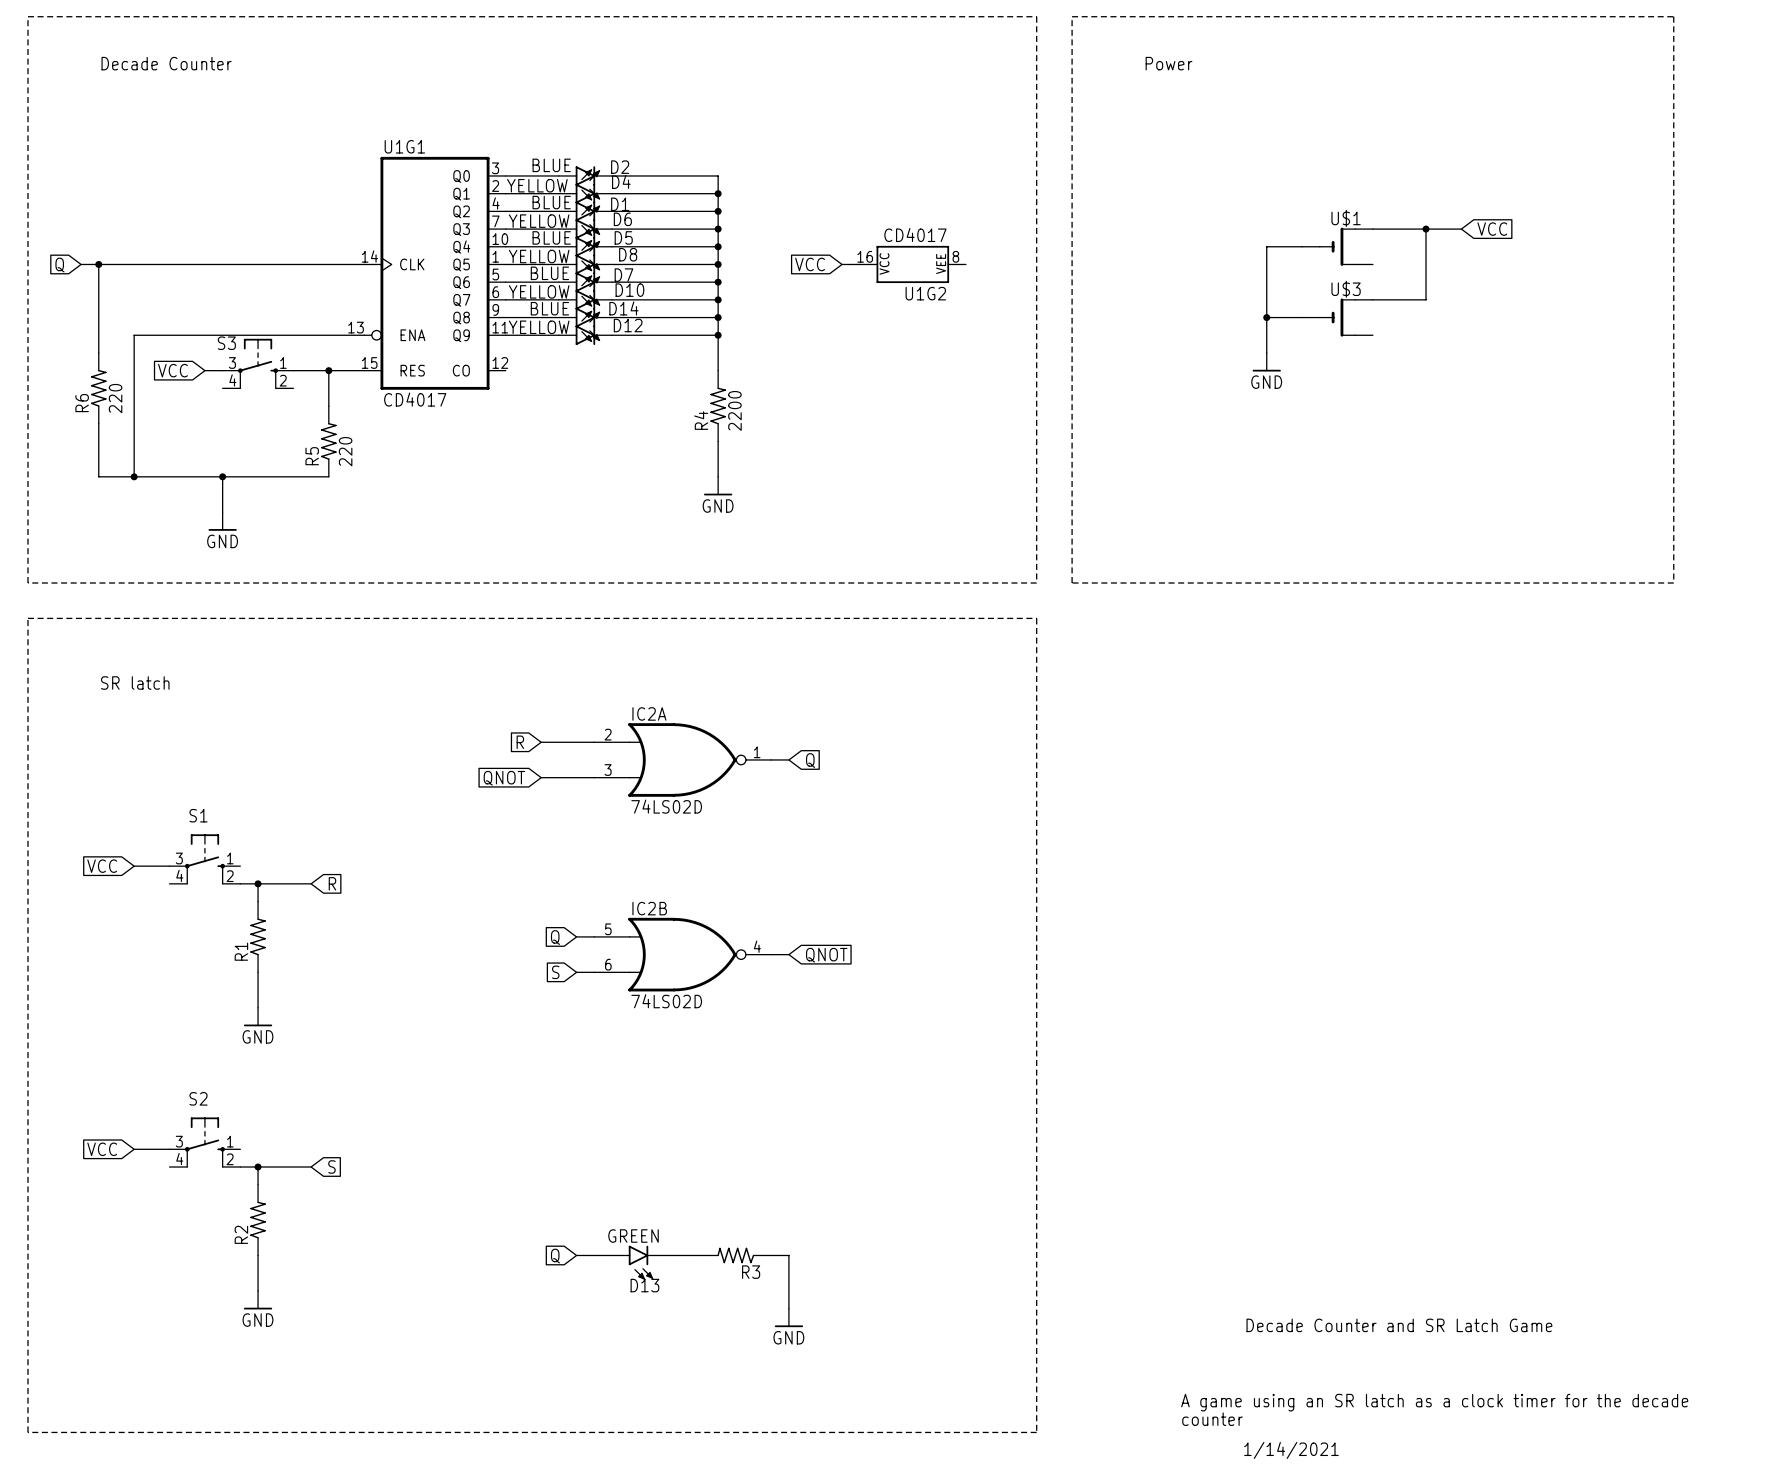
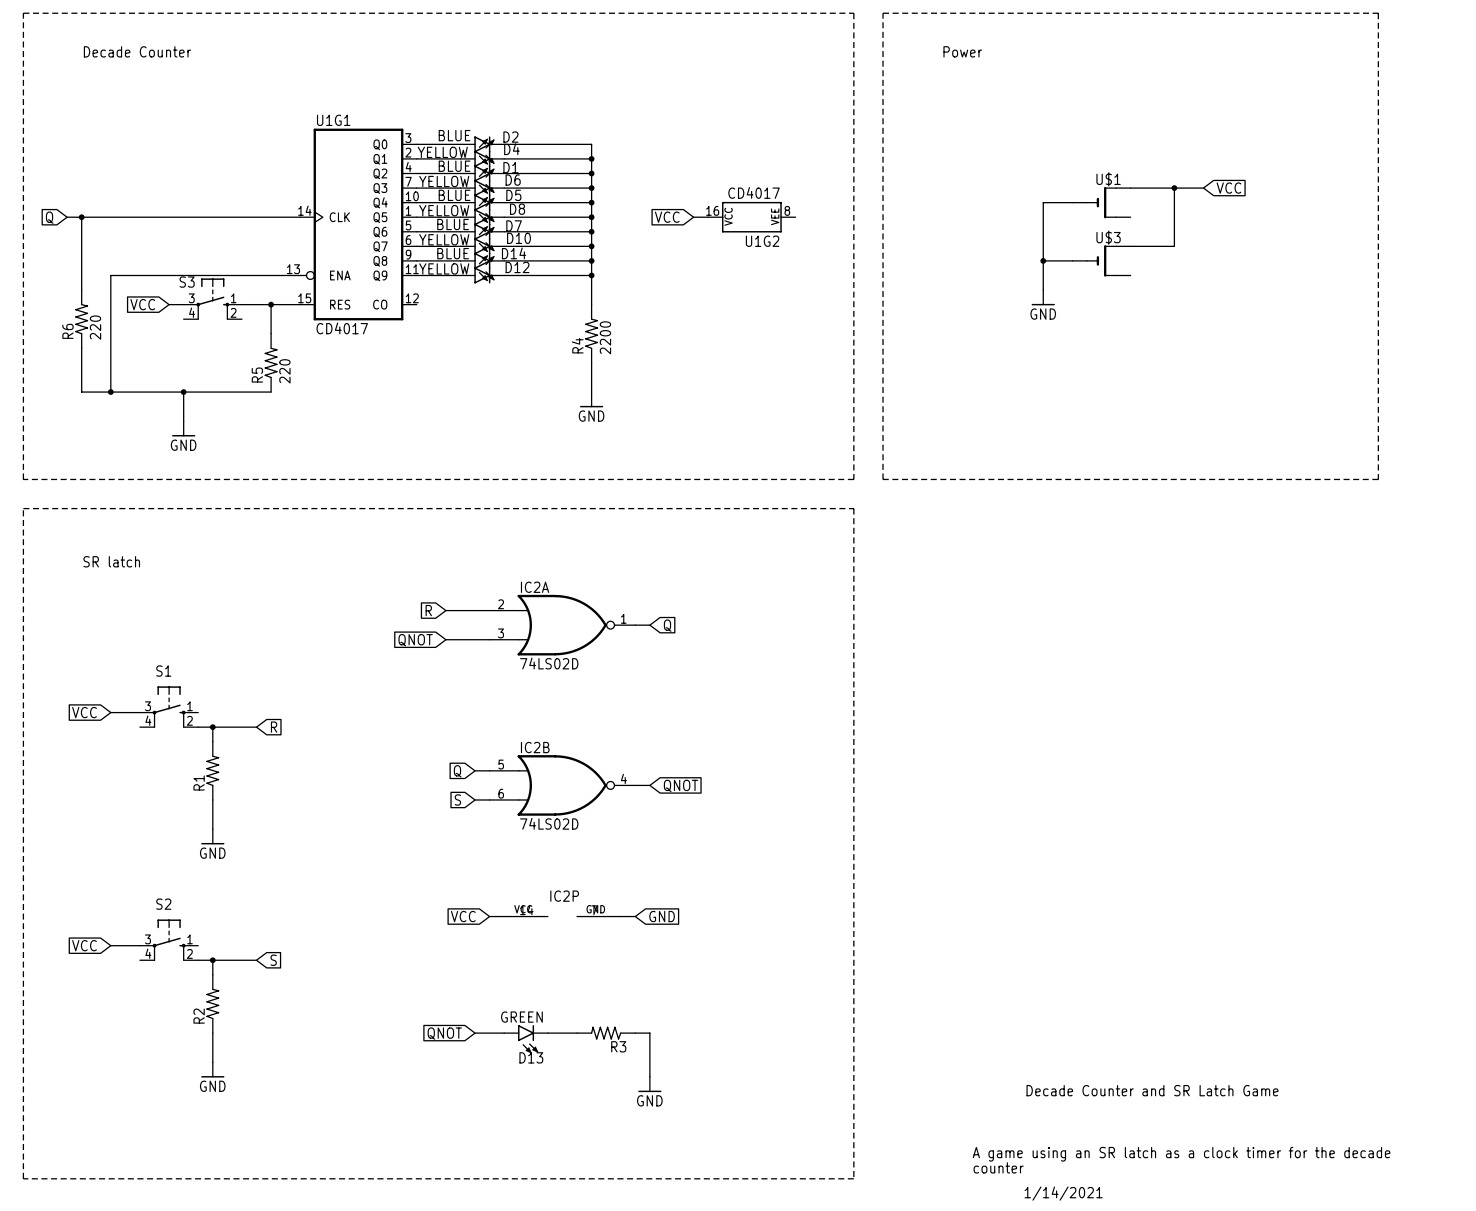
global label: none -> VCC (463, 916)
wire: none -> (489, 916) (504, 916)
IC2P: none -> (562, 916)
wire: none -> (620, 916) (635, 916)
global label: none -> GND (662, 916)
global label: Q (555, 1256) -> QNOT (444, 1033)

